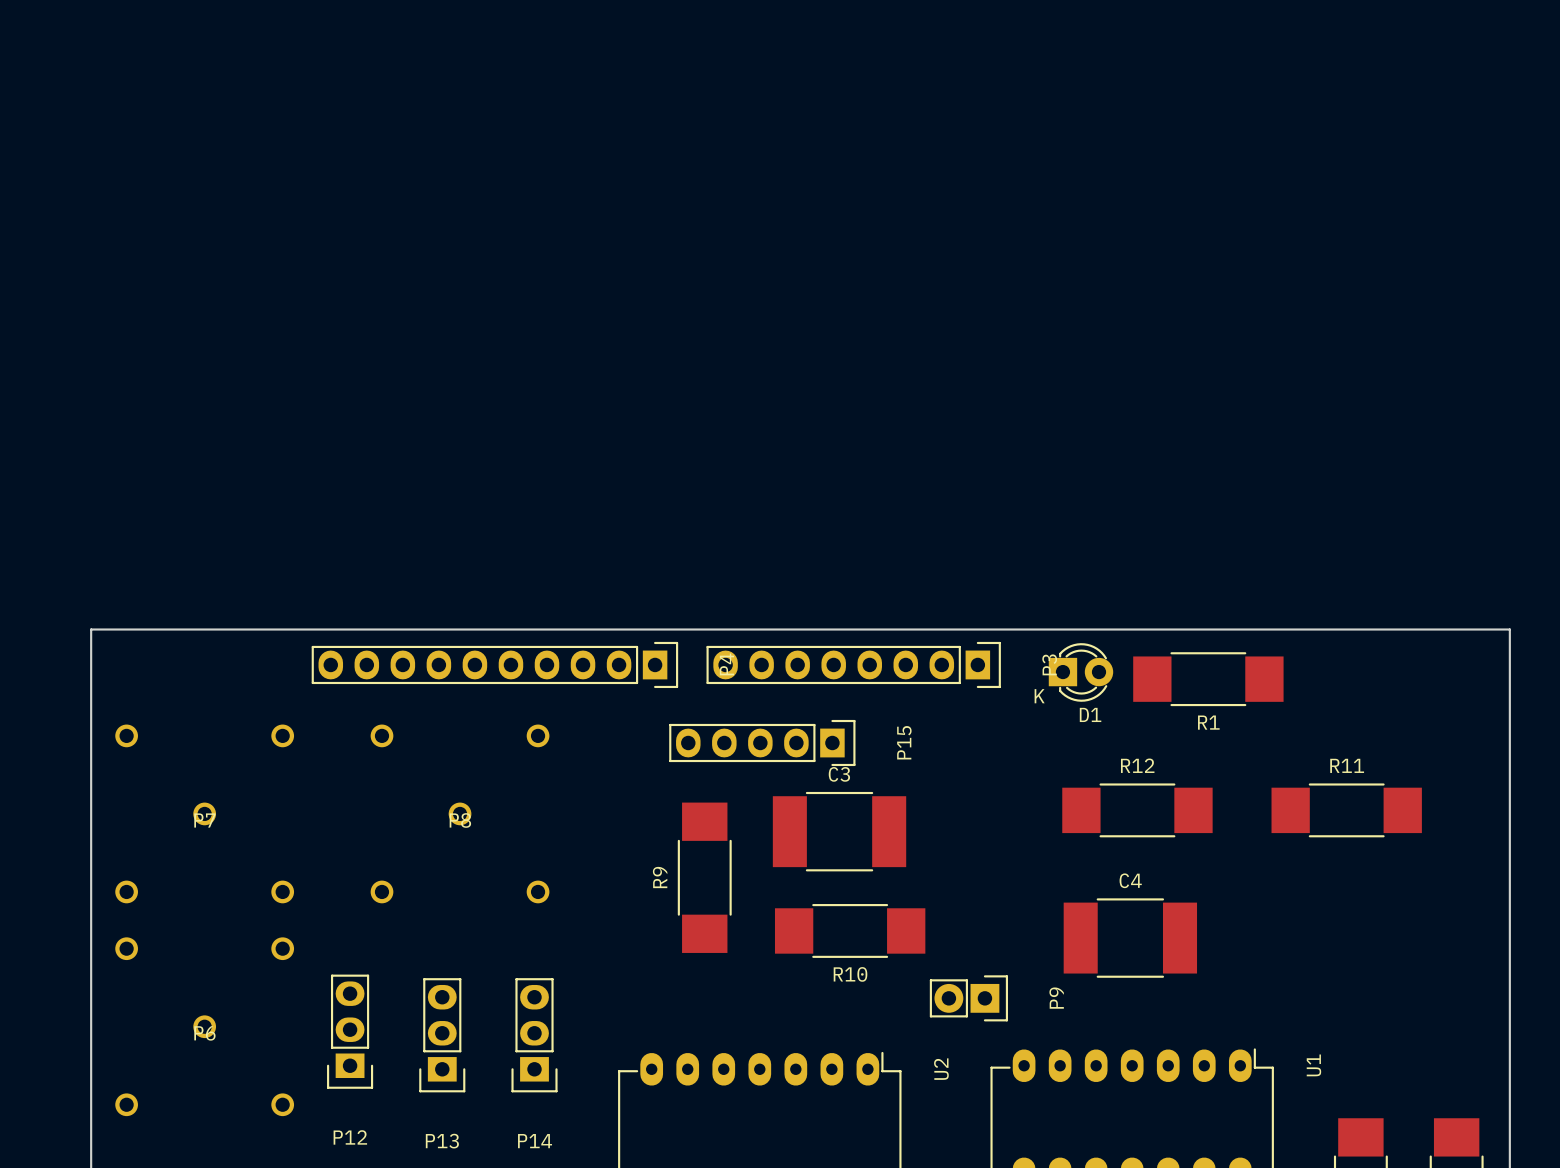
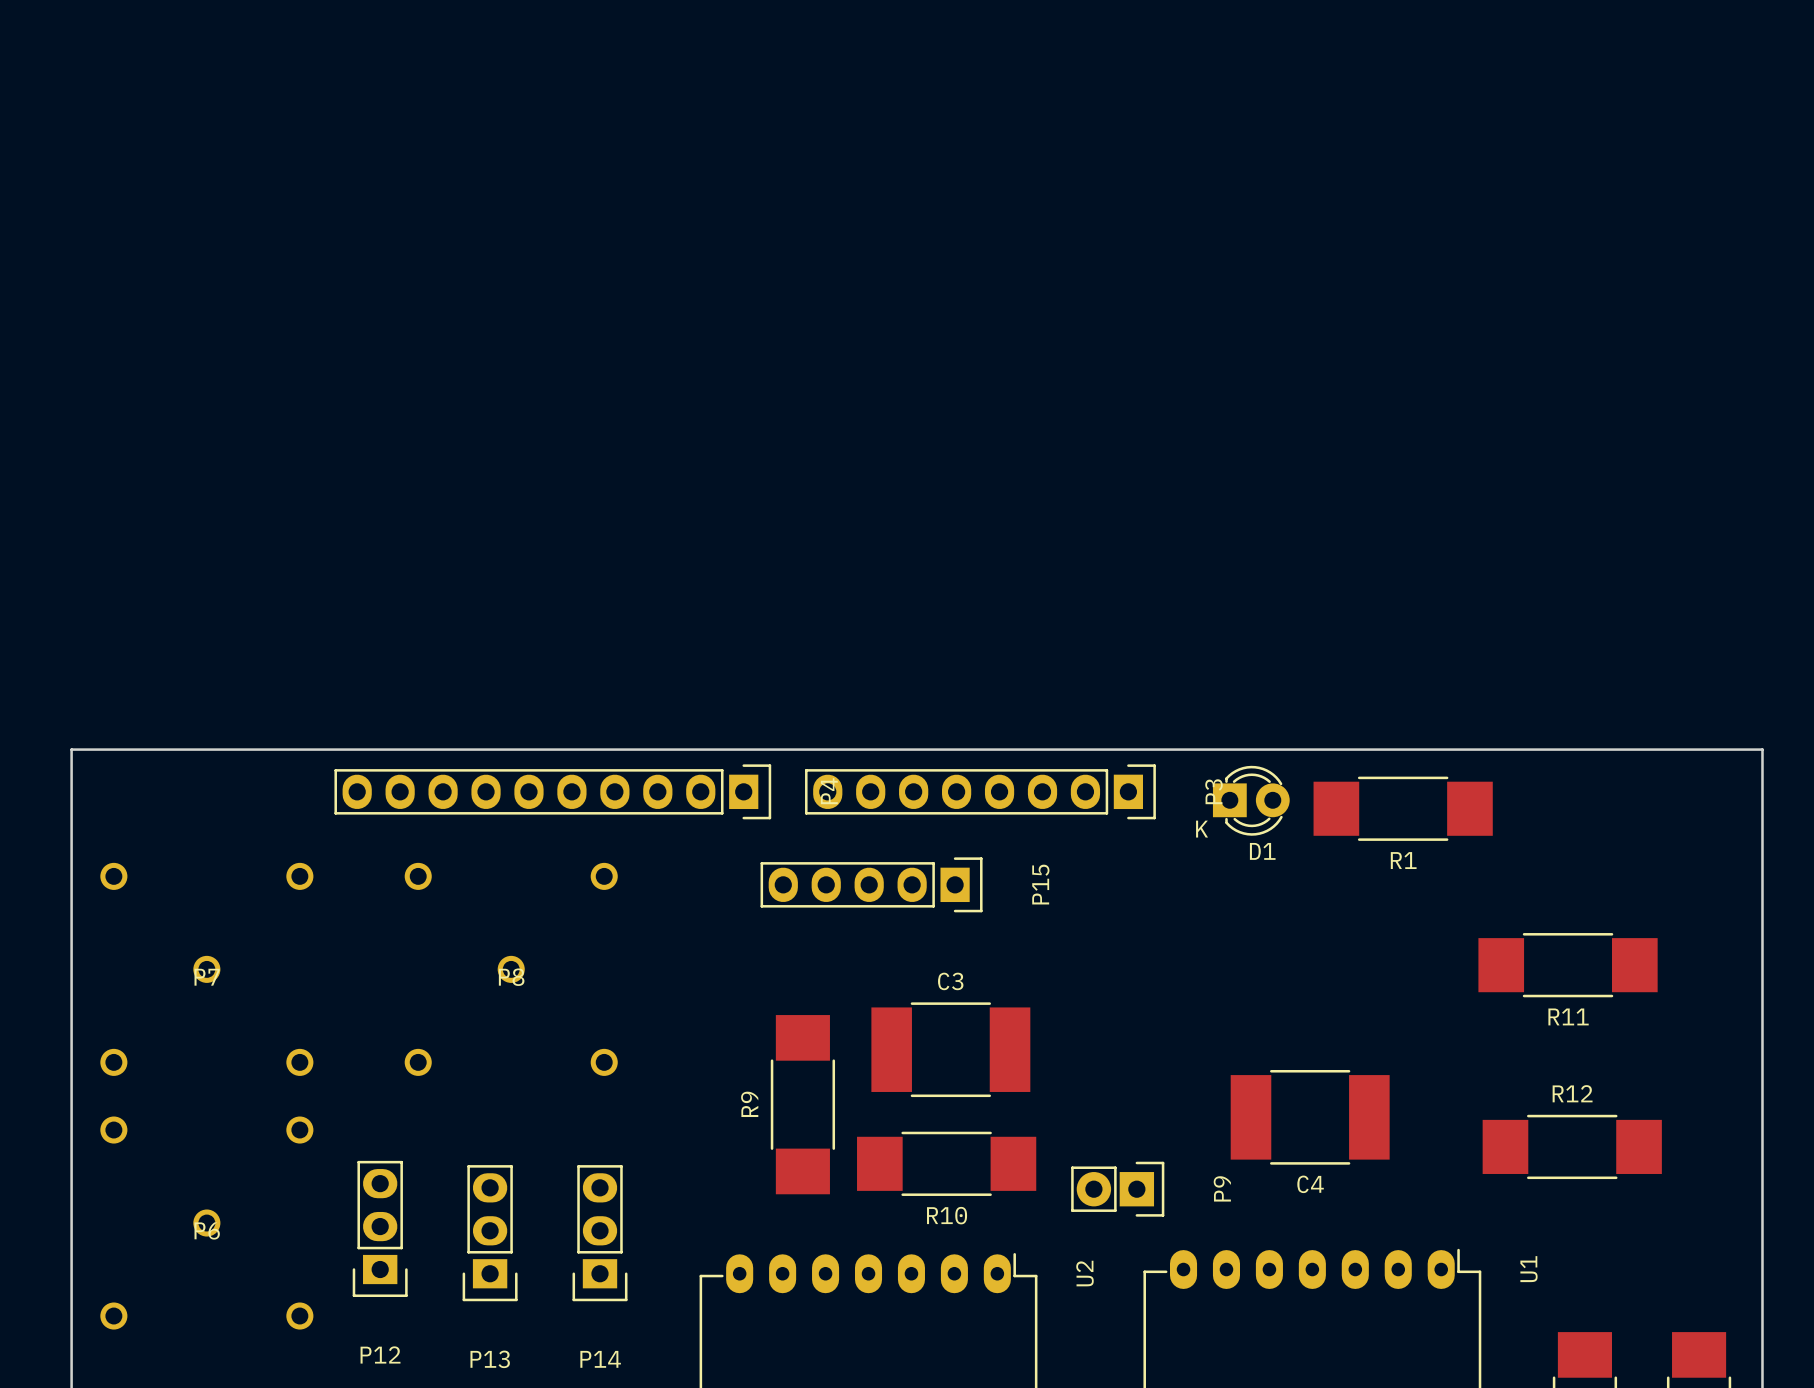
R11 name position: R11 (1347, 765) -> R11 (1568, 1016)
R12 position: (1137, 810) -> (1572, 1146)
C3 position: (839, 831) -> (950, 1049)
R9 position: (704, 877) -> (802, 1104)
C4 name position: C4 (1130, 880) -> C4 (1310, 1184)
R10 position: (850, 930) -> (946, 1163)

